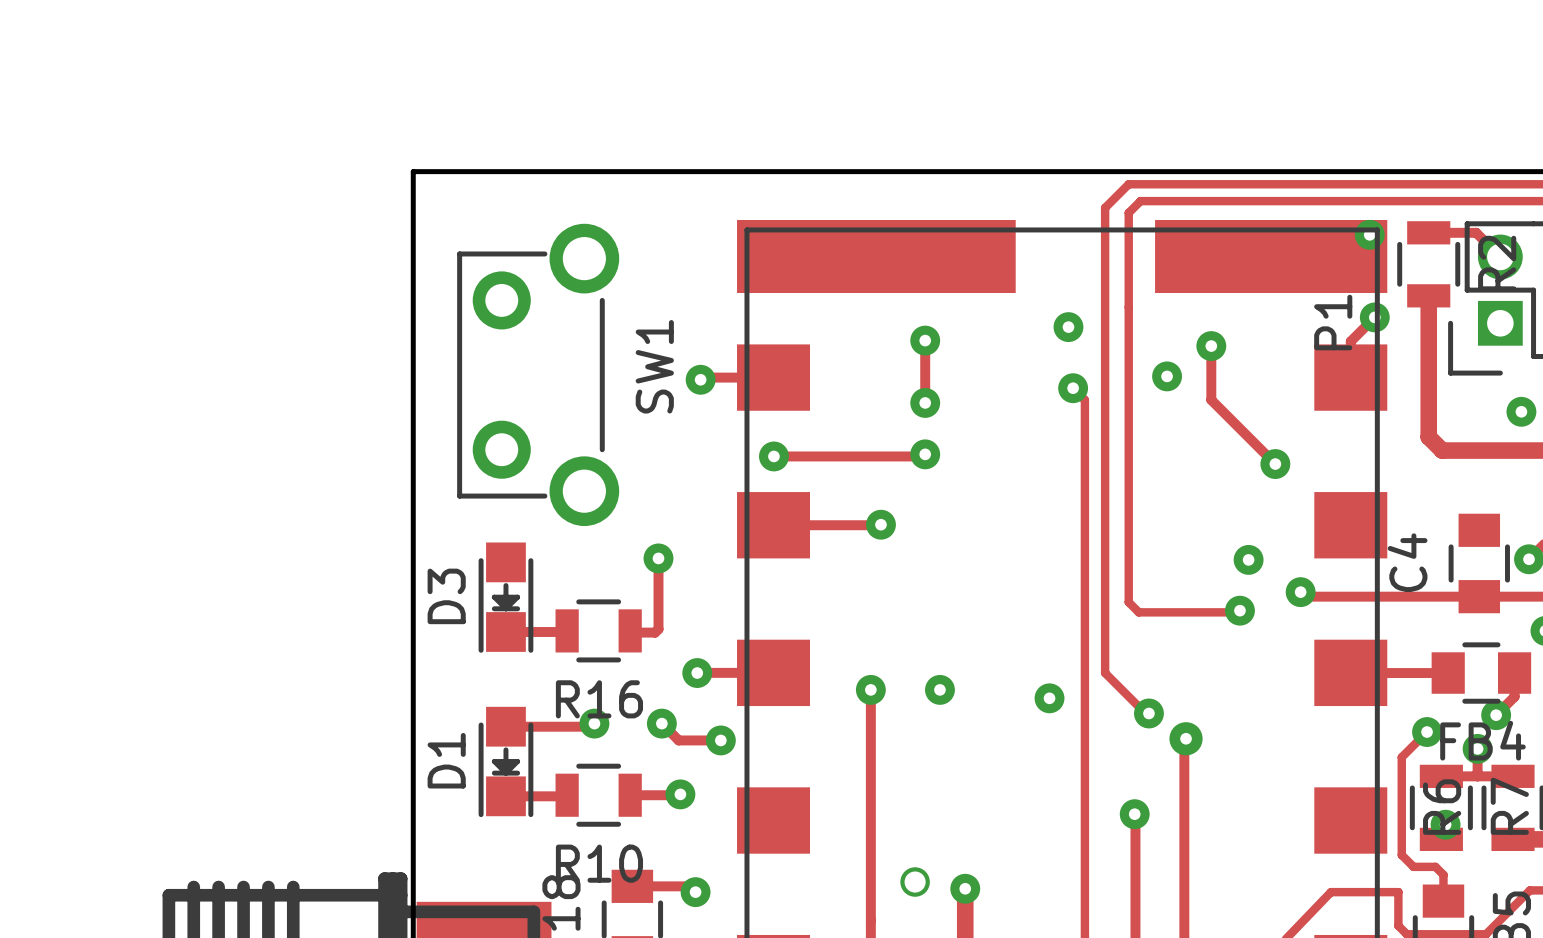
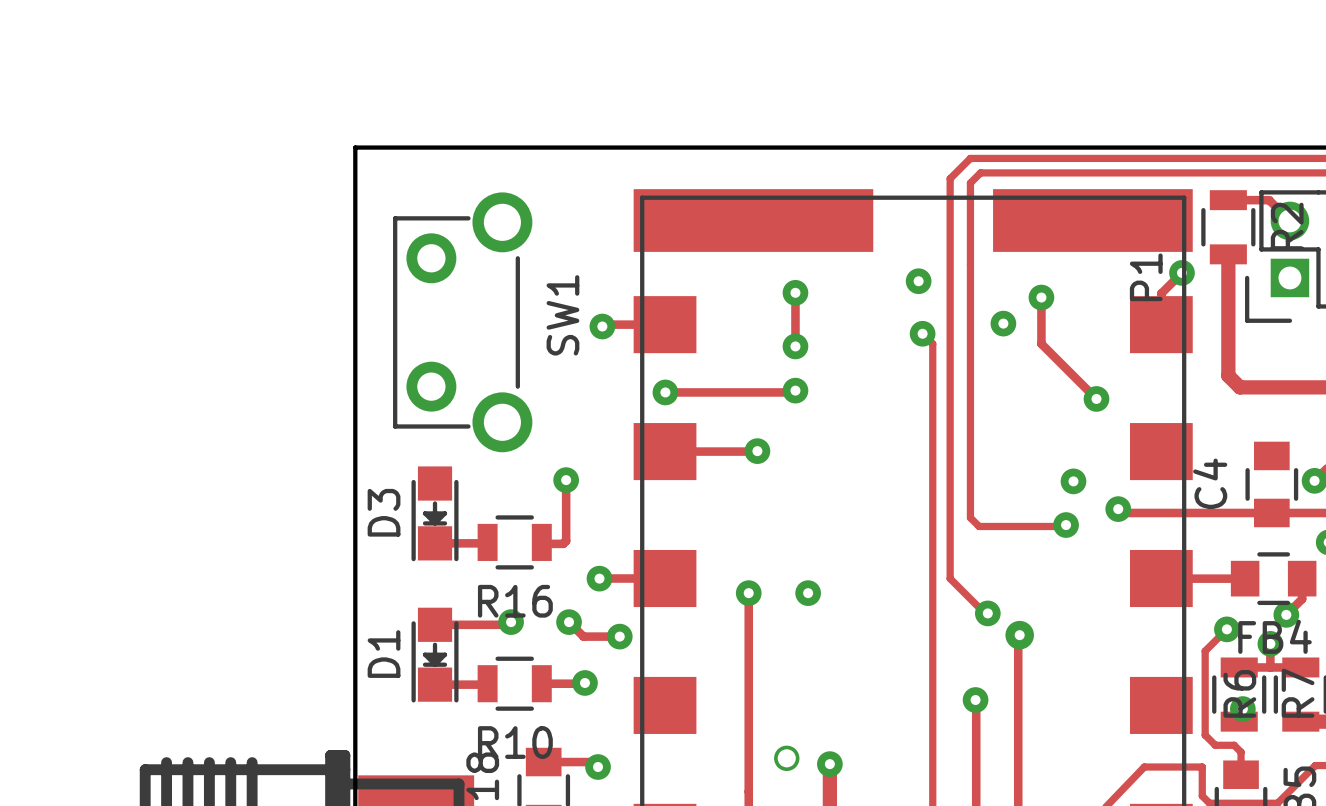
via: (1369, 234) -> none
via: (1521, 411) -> none
via: (1049, 698) -> none

